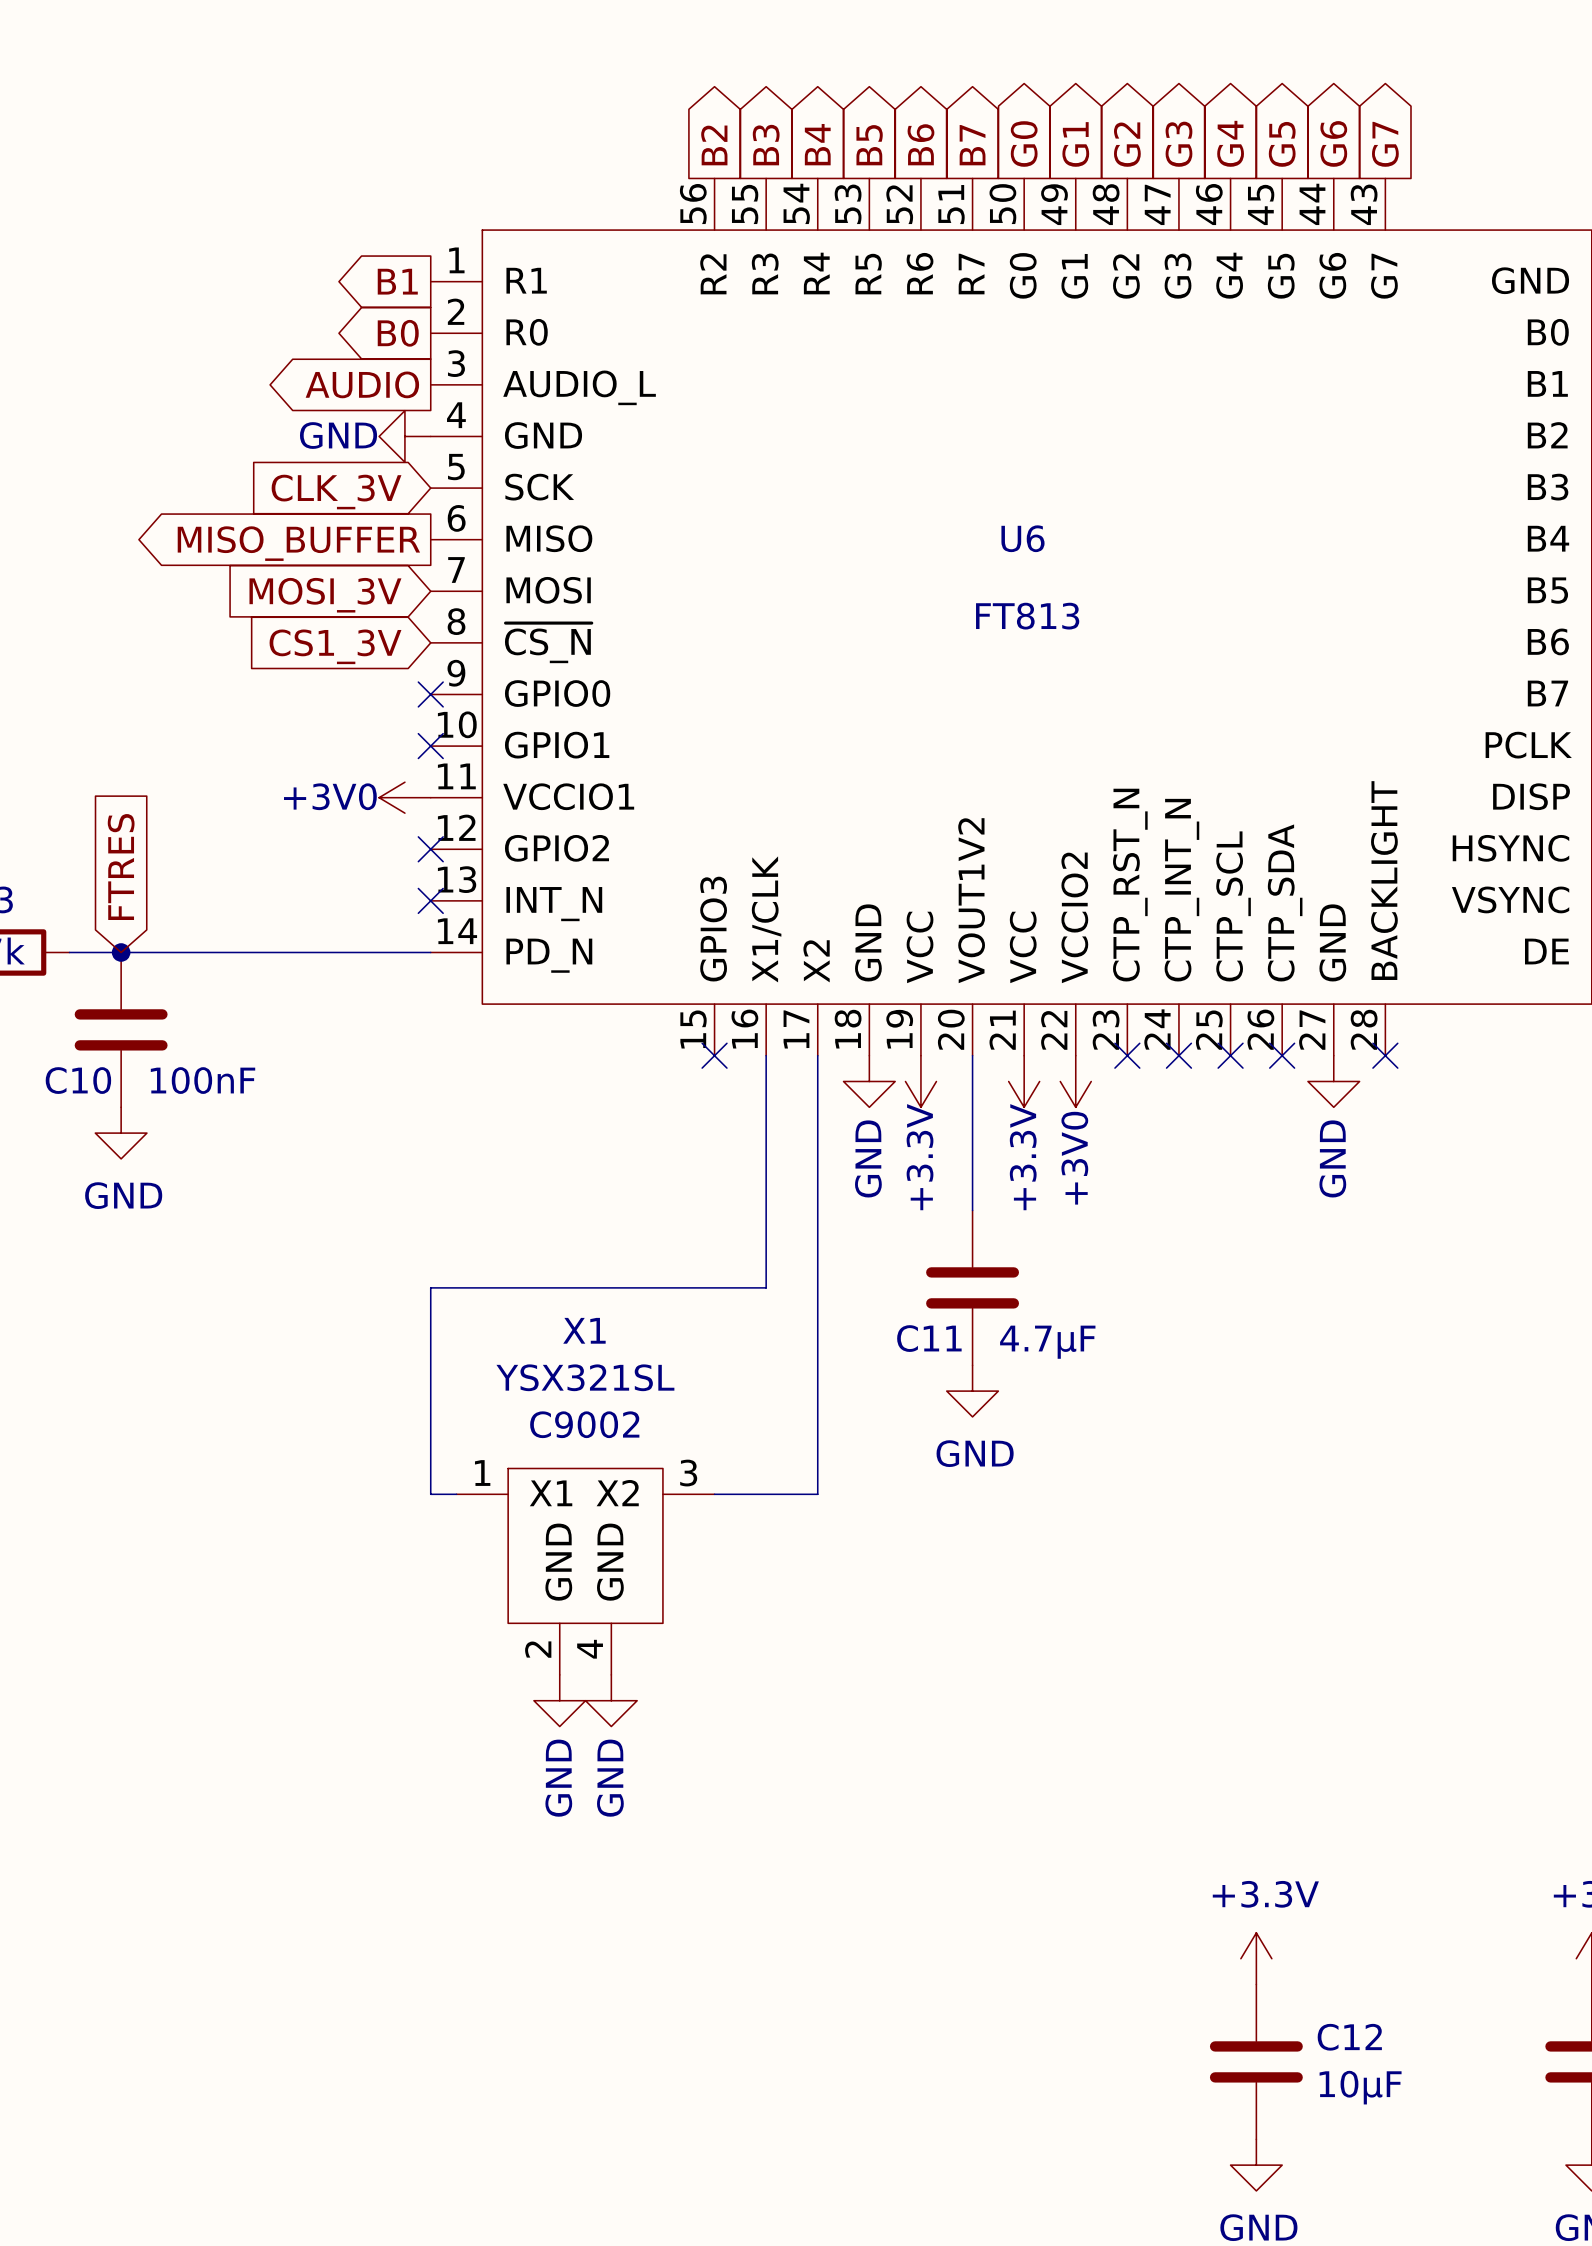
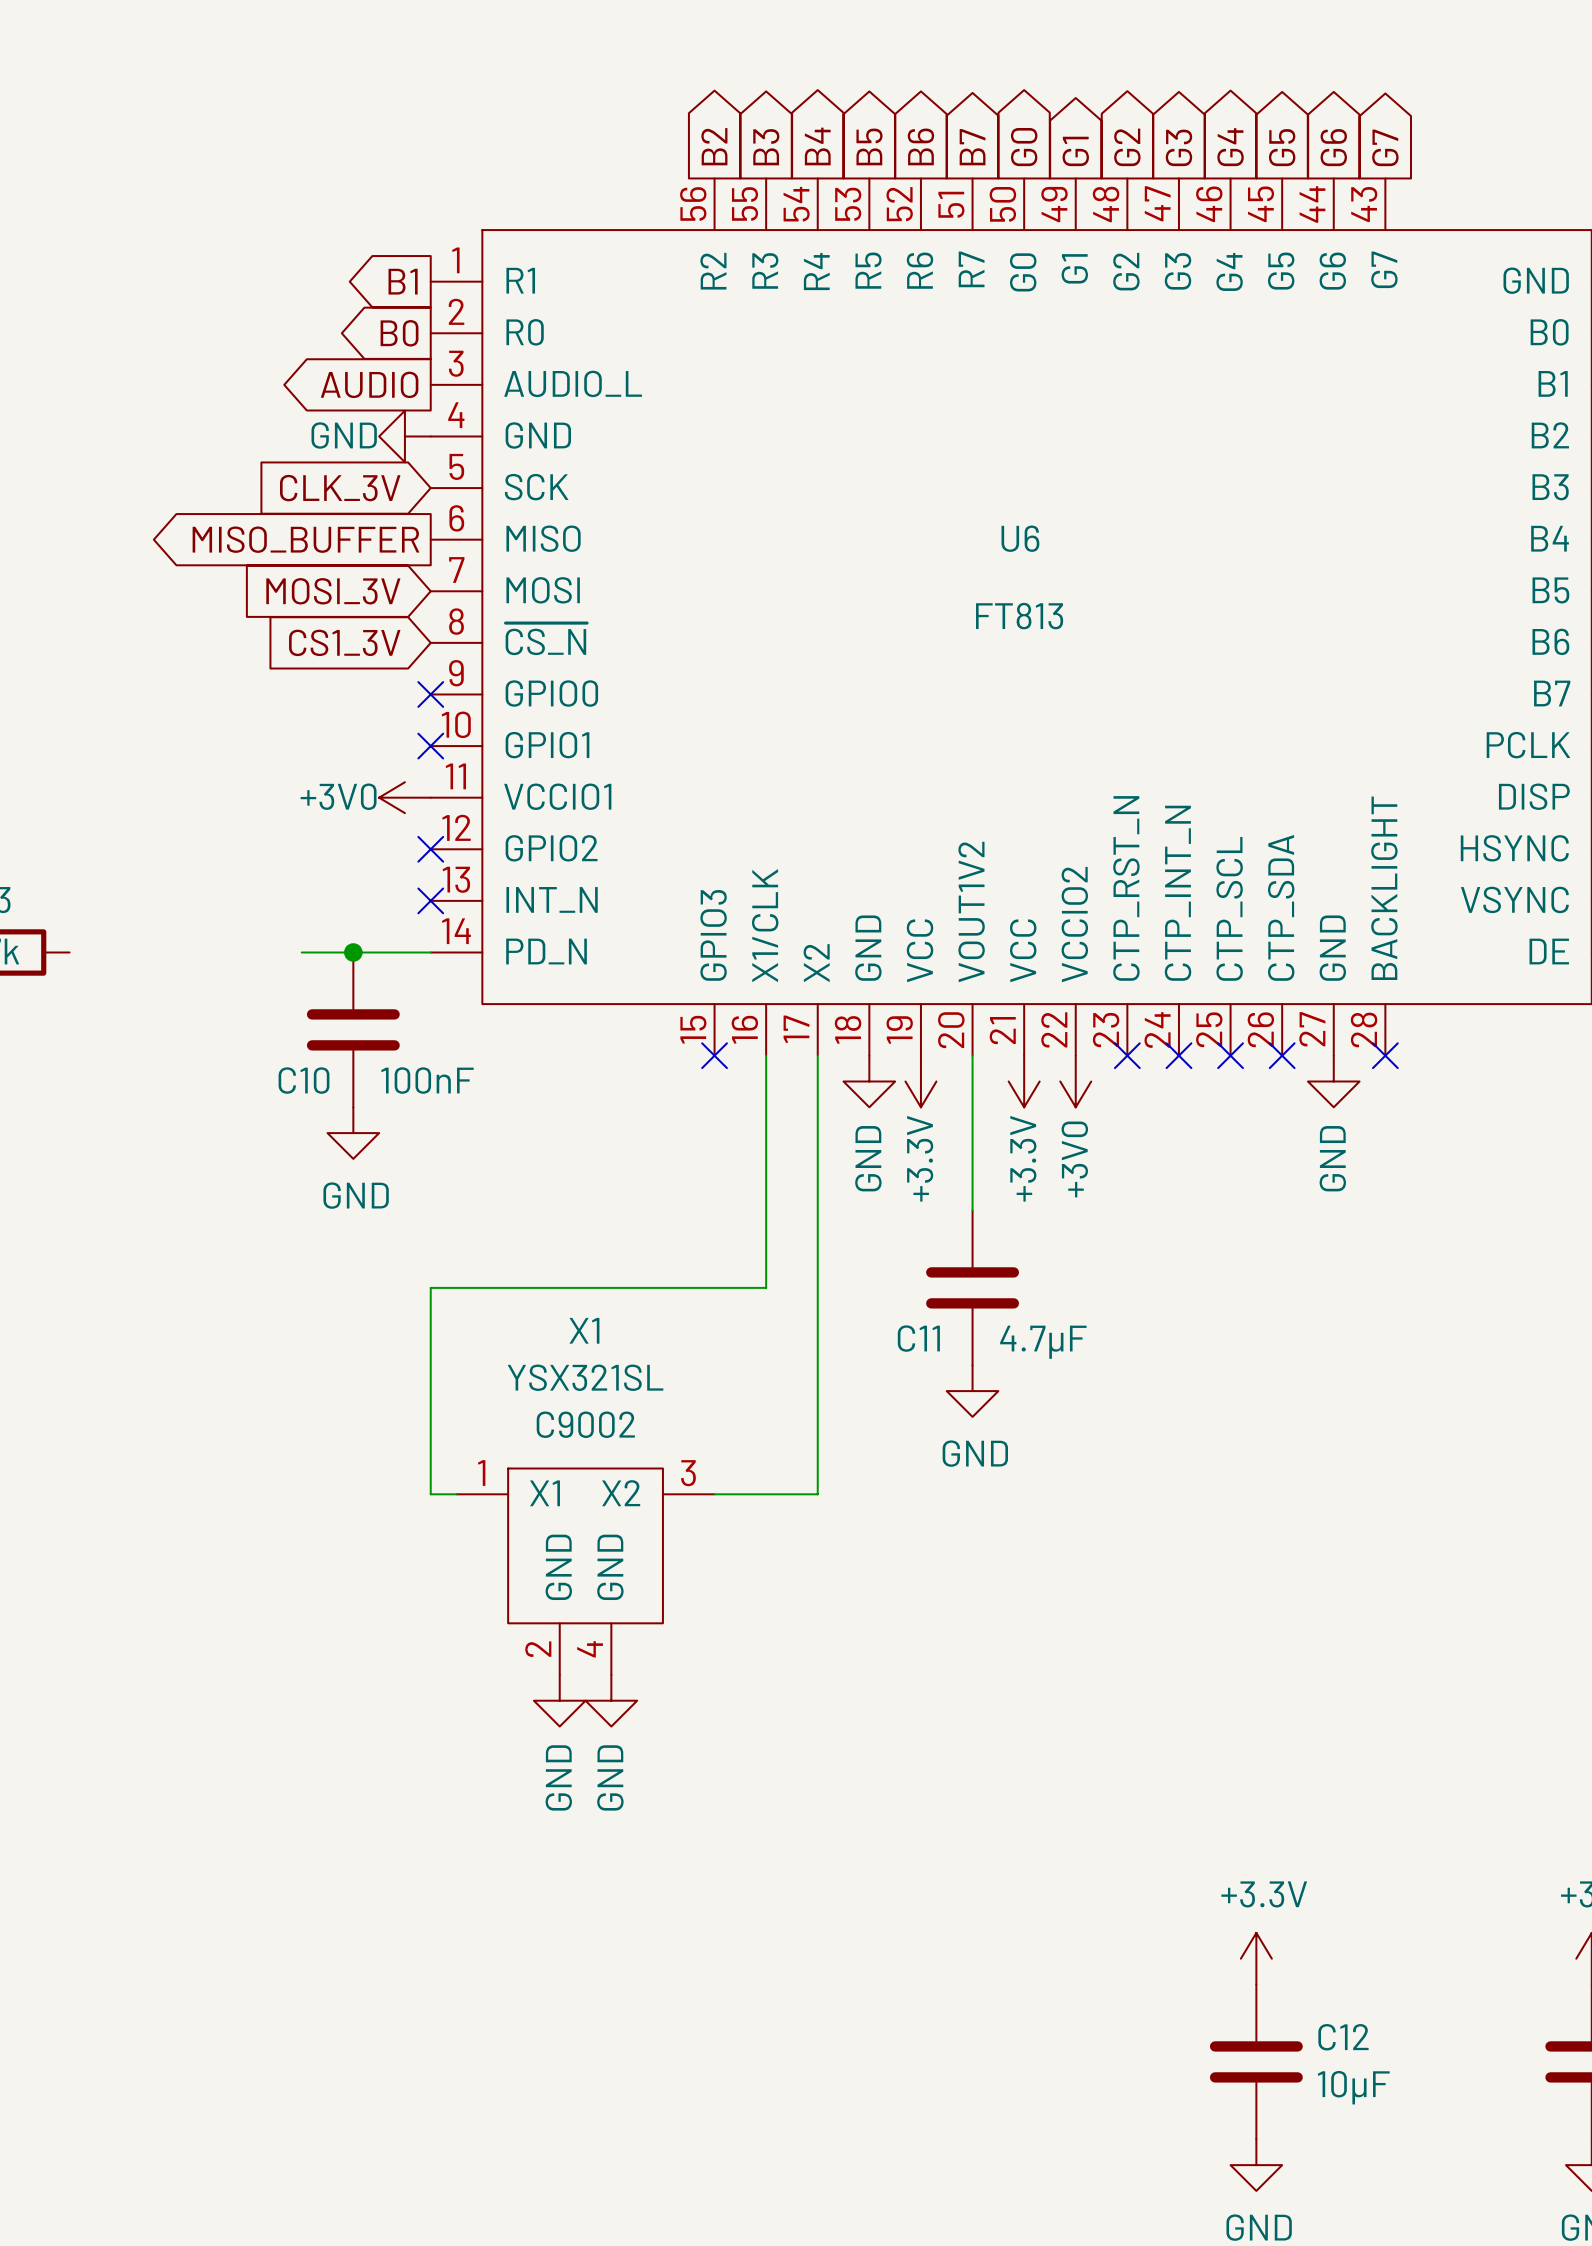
global label: FTRES (121, 867) -> none
wire: (69, 952) (301, 952) -> none
junction: (121, 952) -> none
junction: none -> (353, 952)
C10 position: (121, 1029) -> (353, 1029)
power symbol position: GND (121, 1133) -> GND (353, 1133)

